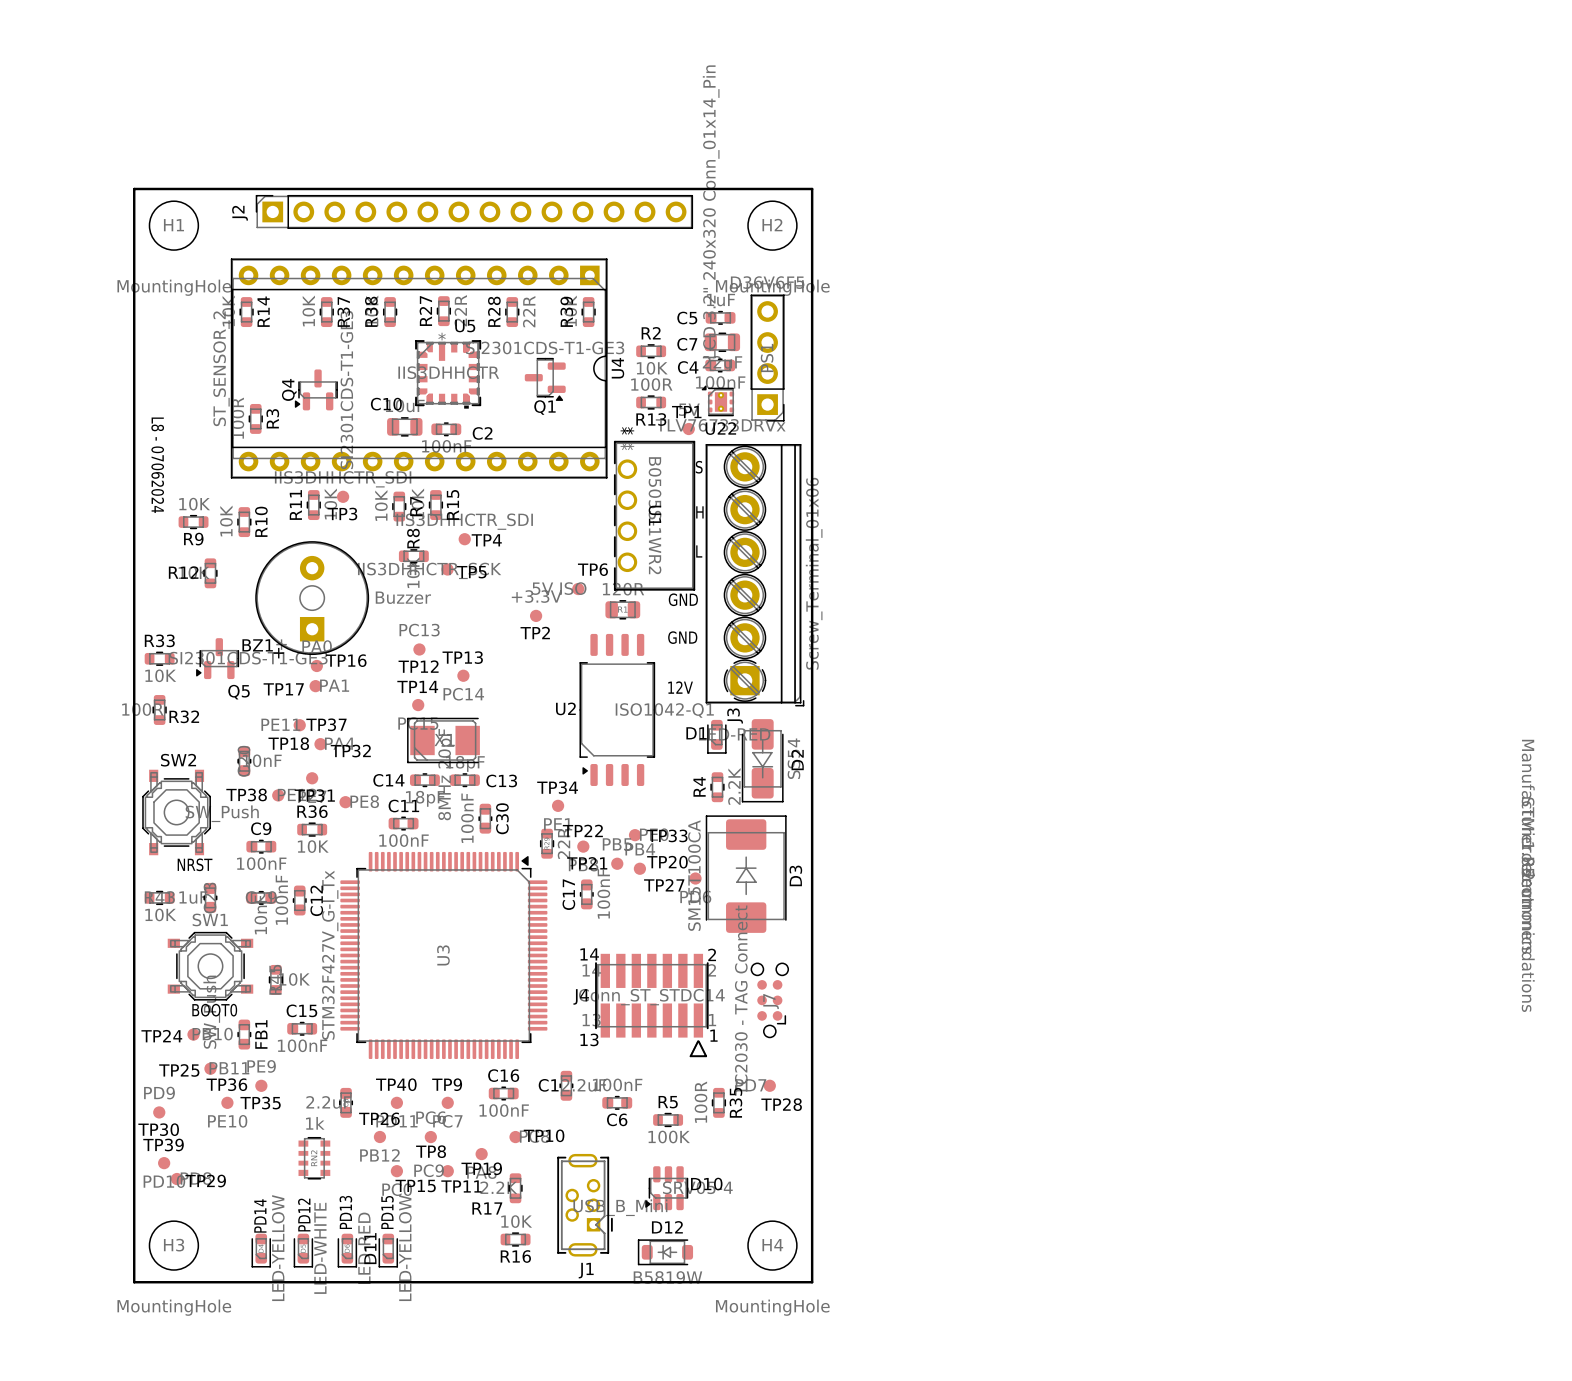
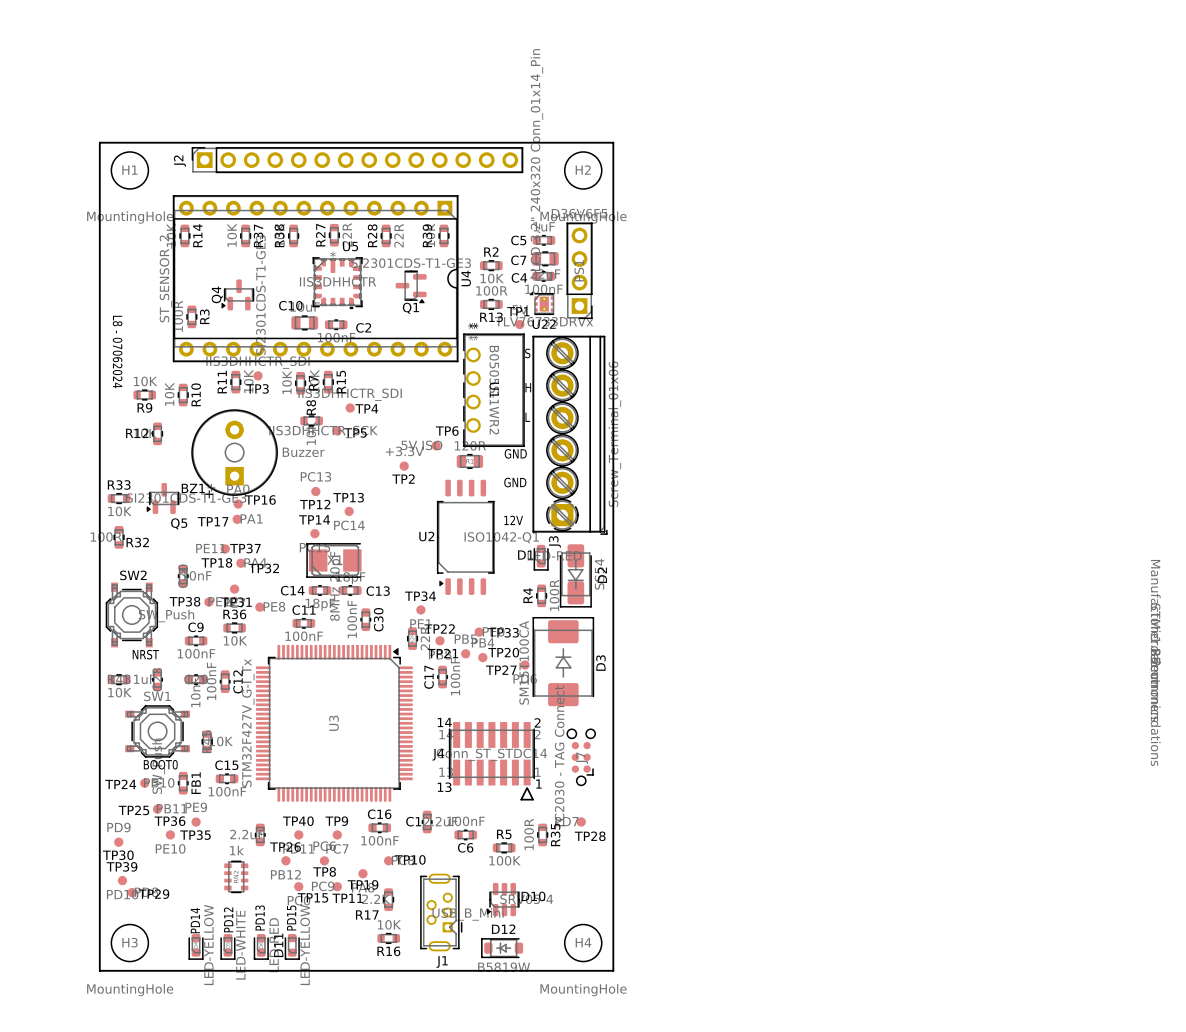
R4 value: 2.2K (734, 786) -> 100R (554, 595)

